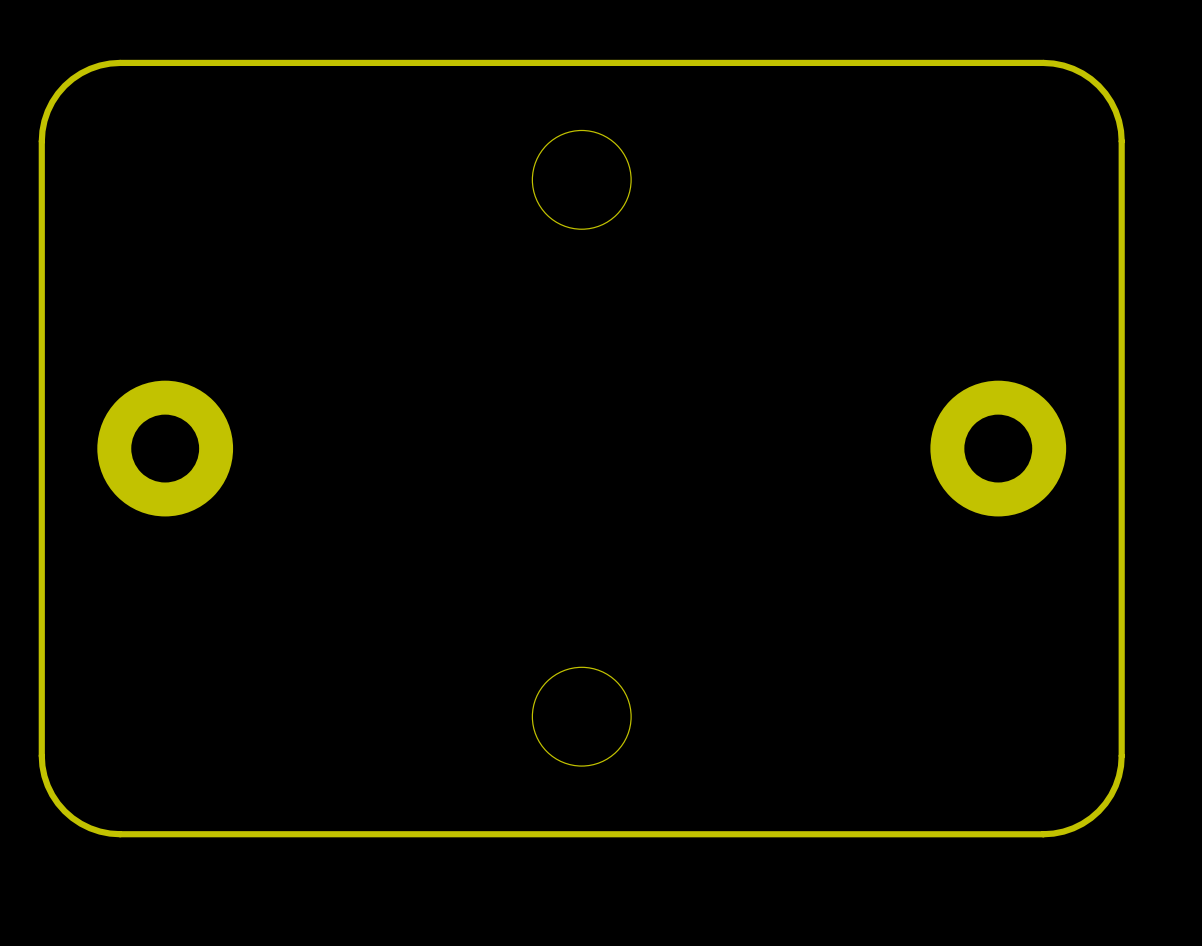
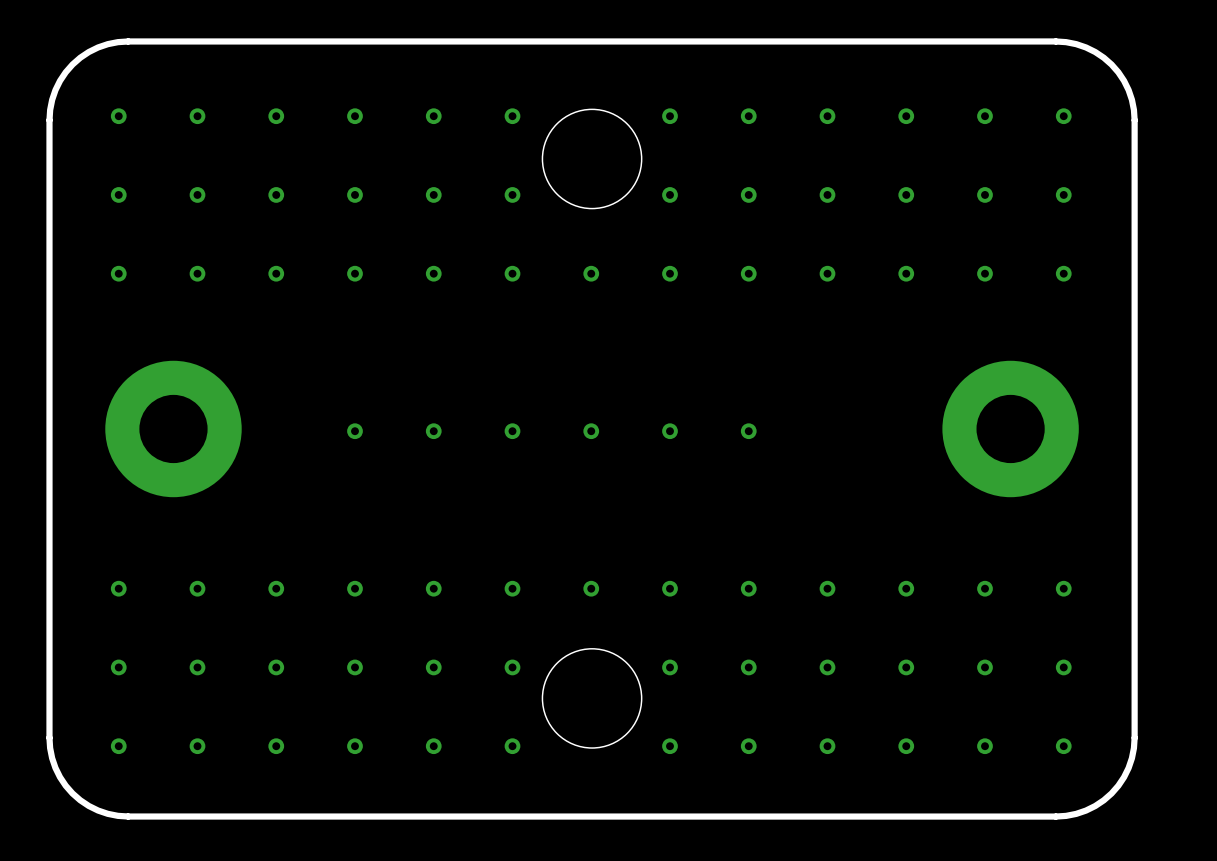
via: none -> (118, 116)
via: none -> (197, 116)
via: none -> (276, 116)
via: none -> (355, 116)
via: none -> (433, 116)
via: none -> (512, 116)
via: none -> (670, 116)
via: none -> (748, 116)
via: none -> (827, 116)
via: none -> (906, 116)
via: none -> (985, 116)
via: none -> (1063, 116)
via: none -> (118, 194)
via: none -> (197, 194)
via: none -> (276, 194)
via: none -> (355, 194)
via: none -> (433, 194)
via: none -> (512, 194)
via: none -> (670, 194)
via: none -> (748, 194)
via: none -> (827, 194)
via: none -> (906, 194)
via: none -> (985, 194)
via: none -> (1063, 194)
via: none -> (118, 273)
via: none -> (197, 273)
via: none -> (276, 273)
via: none -> (355, 273)
via: none -> (433, 273)
via: none -> (512, 273)
via: none -> (591, 273)
via: none -> (670, 273)
via: none -> (748, 273)
via: none -> (827, 273)
via: none -> (906, 273)
via: none -> (985, 273)
via: none -> (1063, 273)
via: none -> (355, 431)
via: none -> (433, 431)
via: none -> (512, 431)
via: none -> (591, 431)
via: none -> (670, 431)
via: none -> (748, 431)
via: none -> (118, 588)
via: none -> (197, 588)
via: none -> (276, 588)
via: none -> (355, 588)
via: none -> (433, 588)
via: none -> (512, 588)
via: none -> (591, 588)
via: none -> (670, 588)
via: none -> (748, 588)
via: none -> (827, 588)
via: none -> (906, 588)
via: none -> (985, 588)
via: none -> (1063, 588)
via: none -> (118, 667)
via: none -> (197, 667)
via: none -> (276, 667)
via: none -> (355, 667)
via: none -> (433, 667)
via: none -> (512, 667)
via: none -> (670, 667)
via: none -> (748, 667)
via: none -> (827, 667)
via: none -> (906, 667)
via: none -> (985, 667)
via: none -> (1063, 667)
via: none -> (118, 746)
via: none -> (197, 746)
via: none -> (276, 746)
via: none -> (355, 746)
via: none -> (433, 746)
via: none -> (512, 746)
via: none -> (670, 746)
via: none -> (748, 746)
via: none -> (827, 746)
via: none -> (906, 746)
via: none -> (985, 746)
via: none -> (1063, 746)

